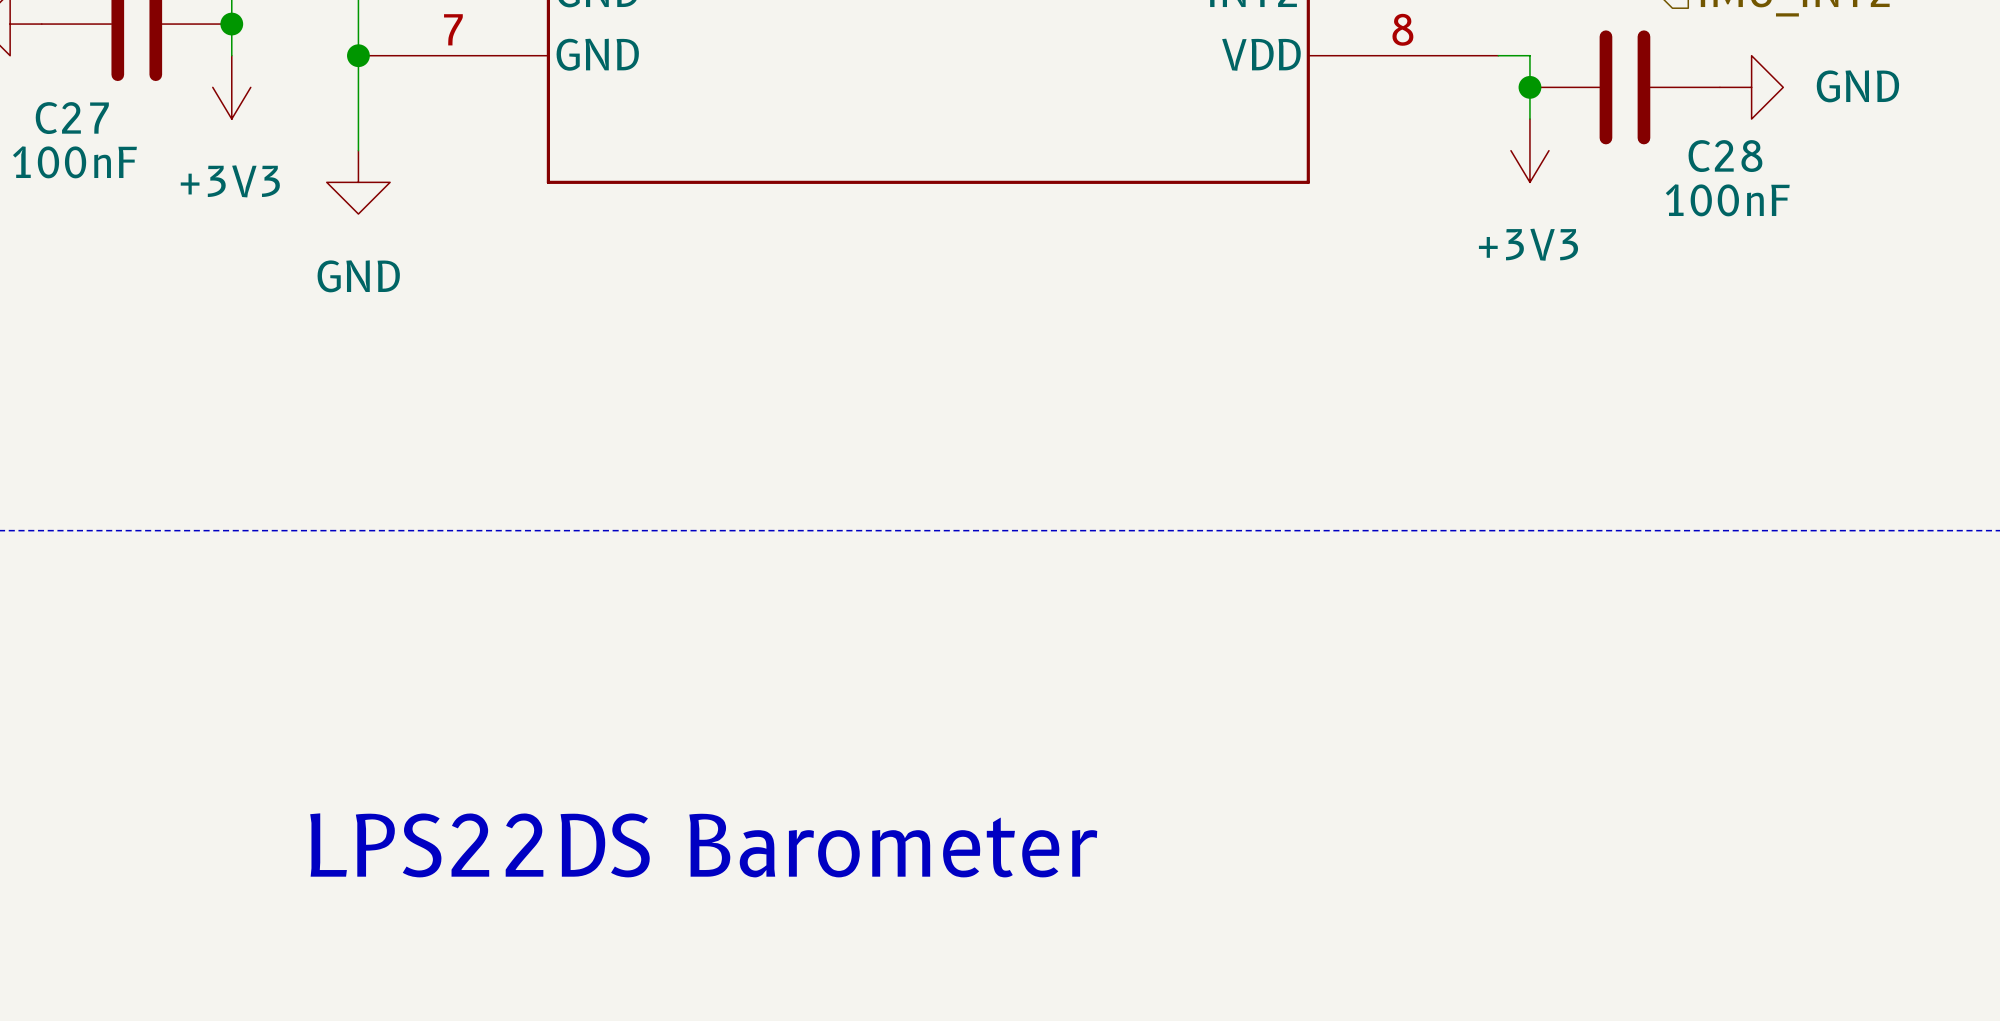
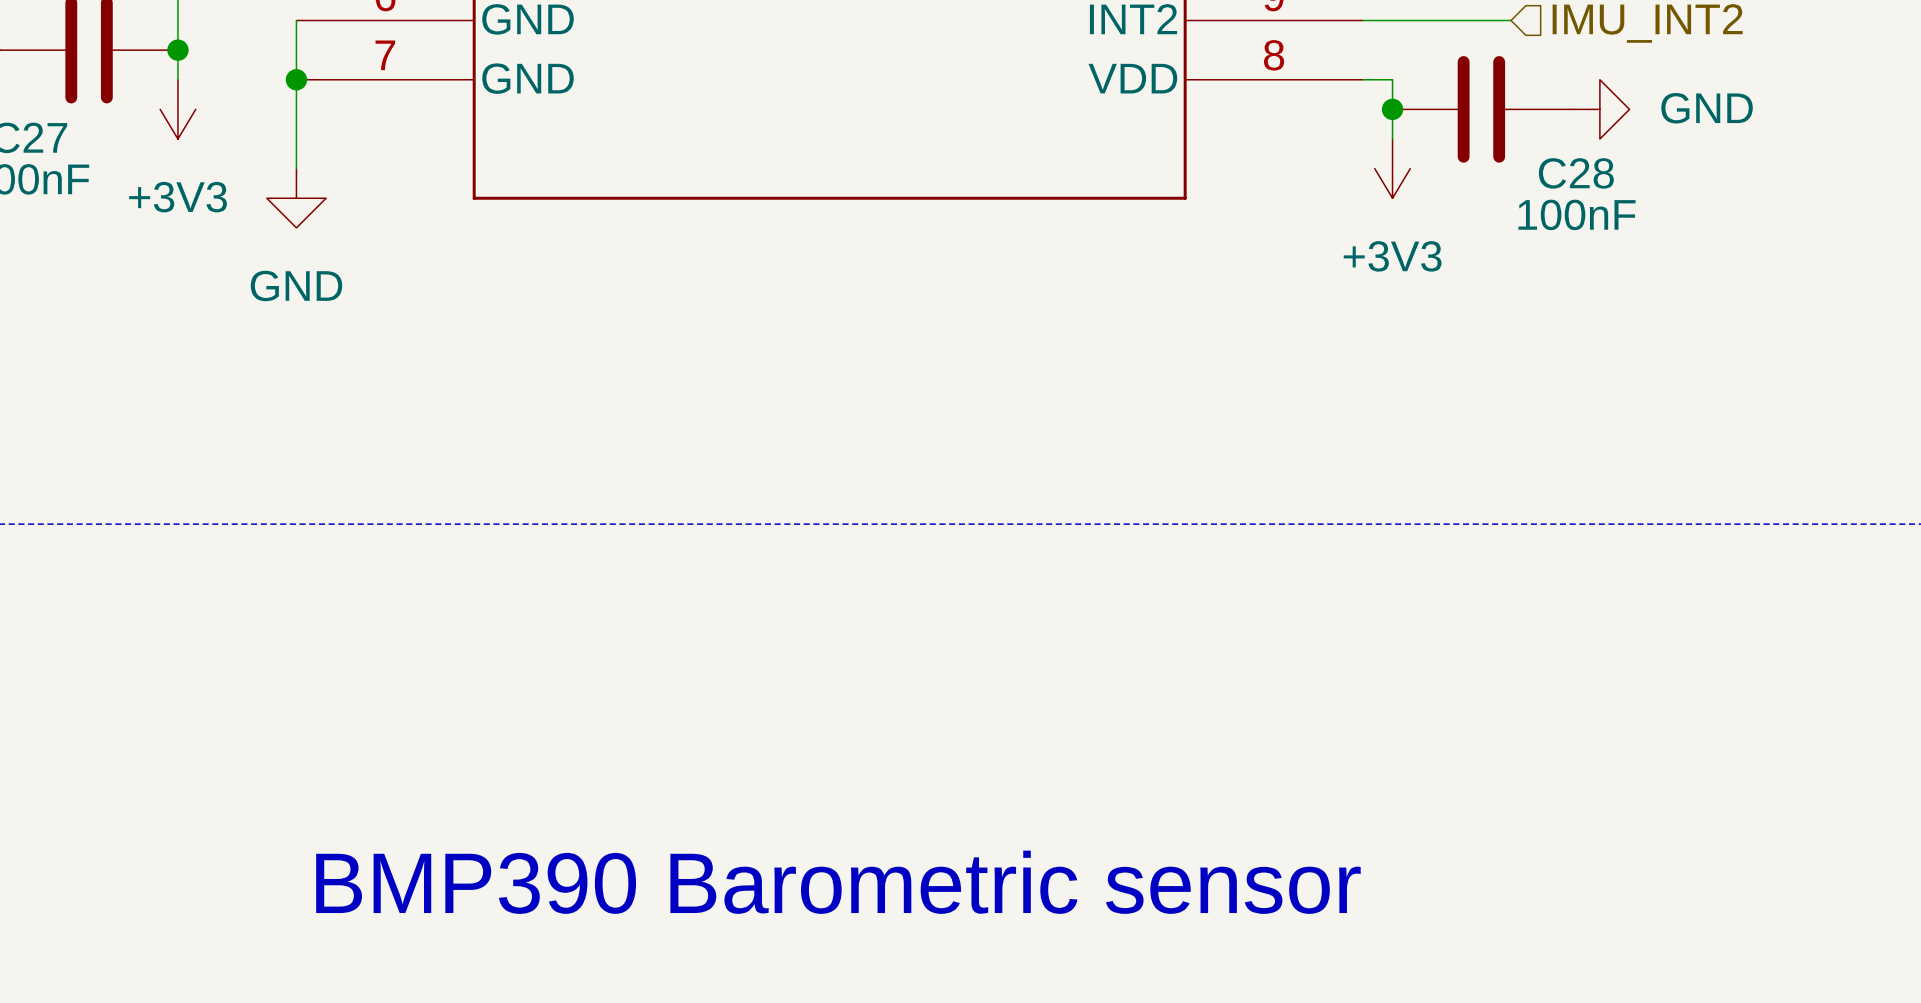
text: LPS22DS Barometer (703, 845) -> none
text: none -> BMP390 Barometric sensor (838, 882)

